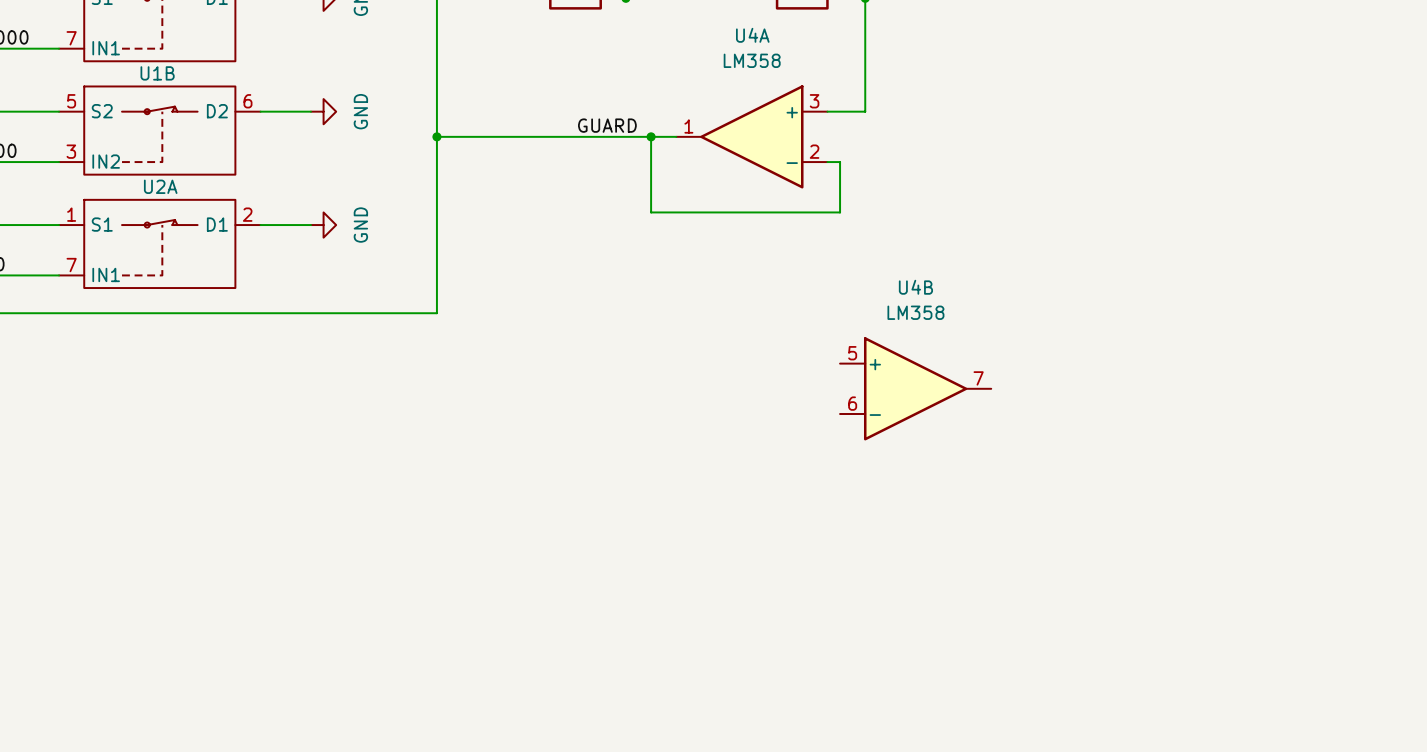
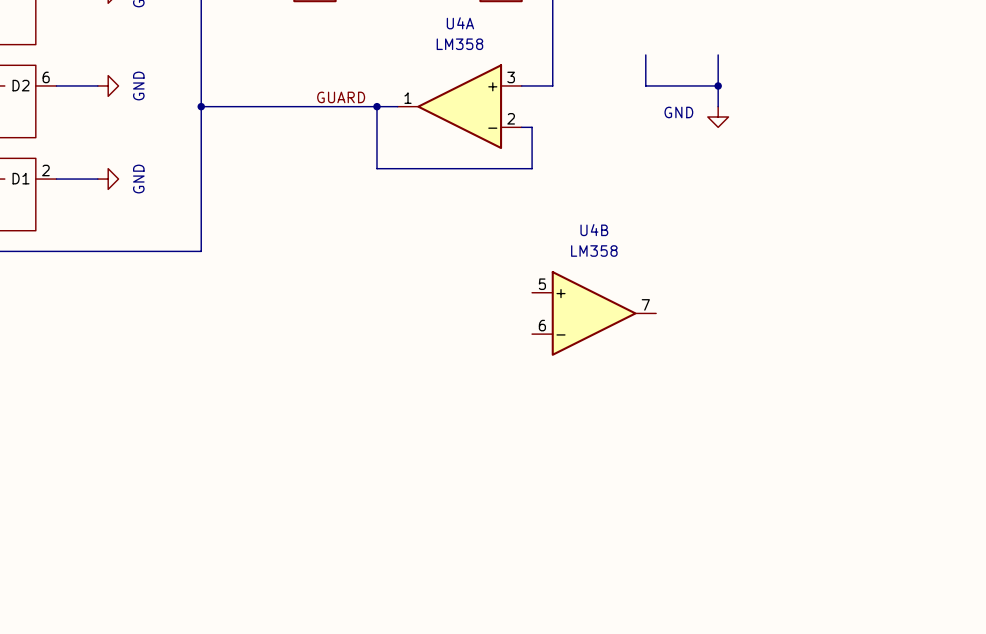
wire: none -> (645, 54) (645, 85) (718, 85)
wire: none -> (718, 54) (718, 106)
junction: none -> (718, 85)
power symbol: none -> GND (718, 116)

